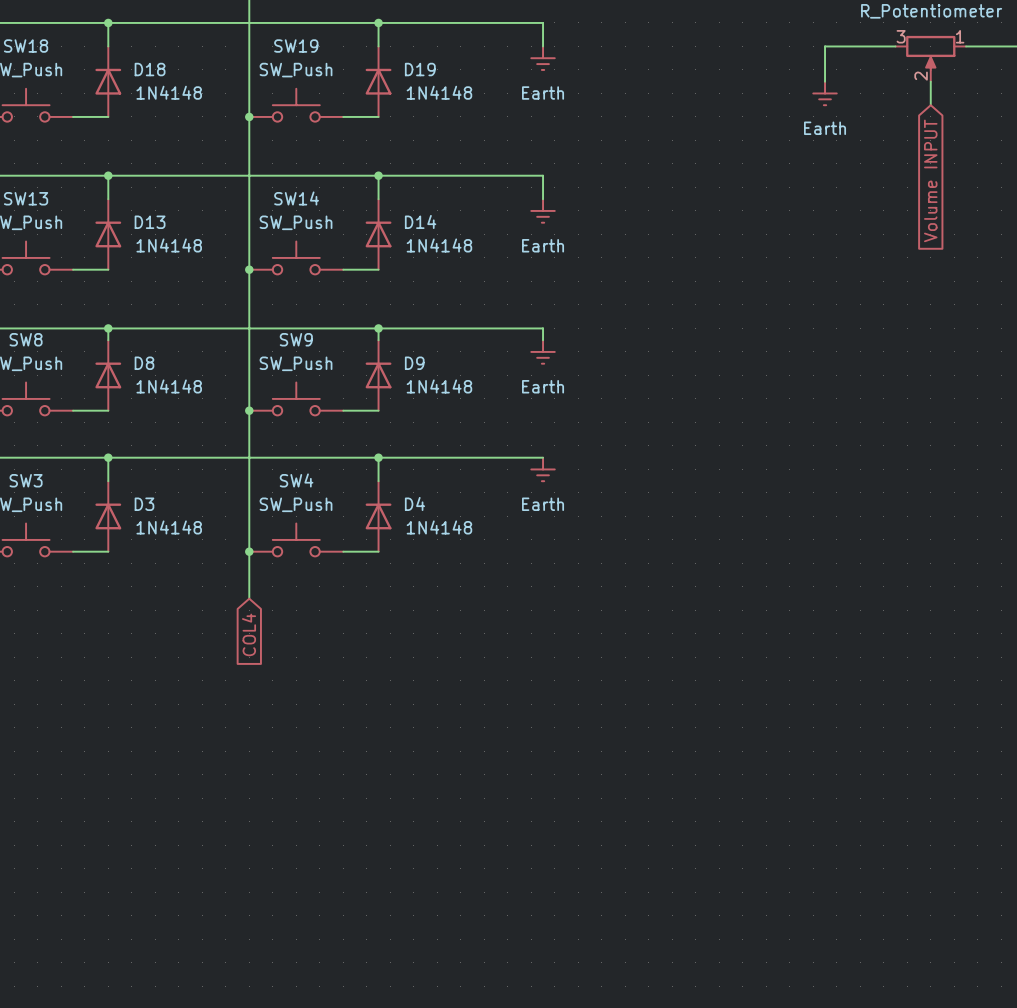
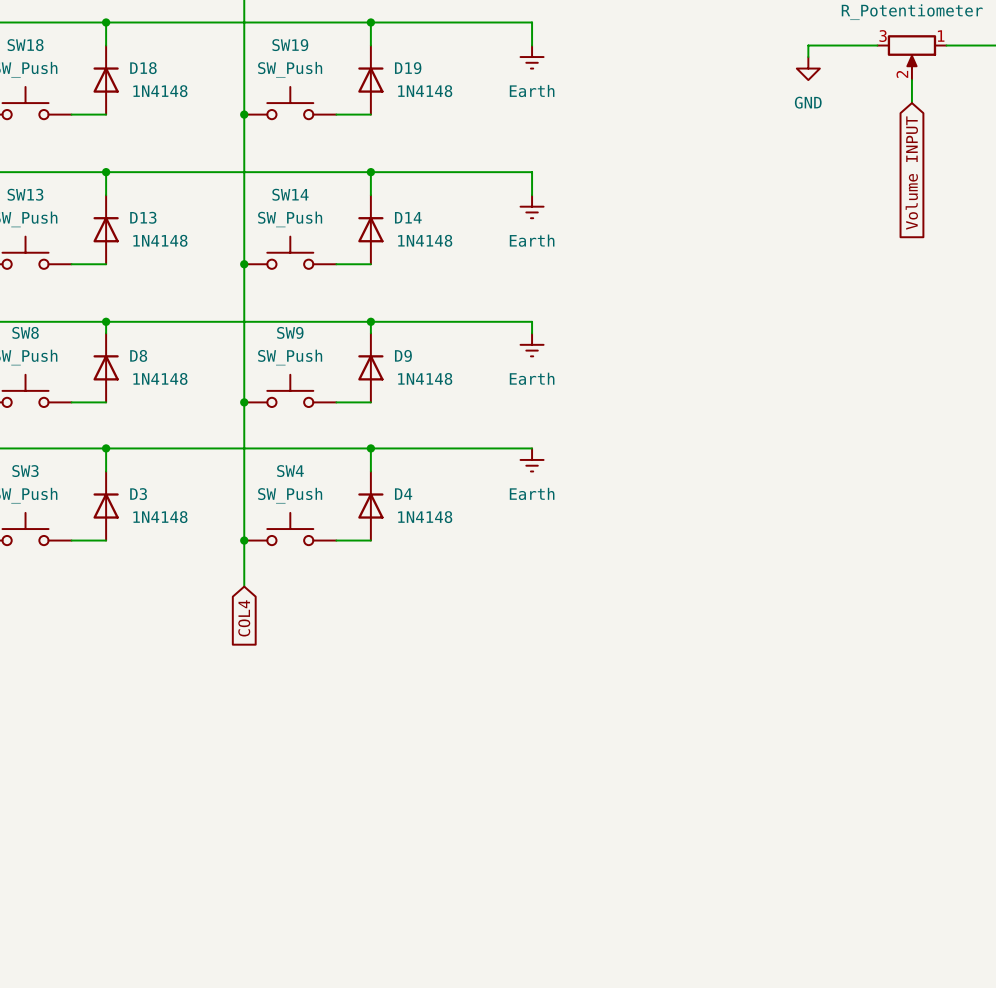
power symbol: none -> GND (808, 68)
power symbol: Earth (825, 93) -> none

